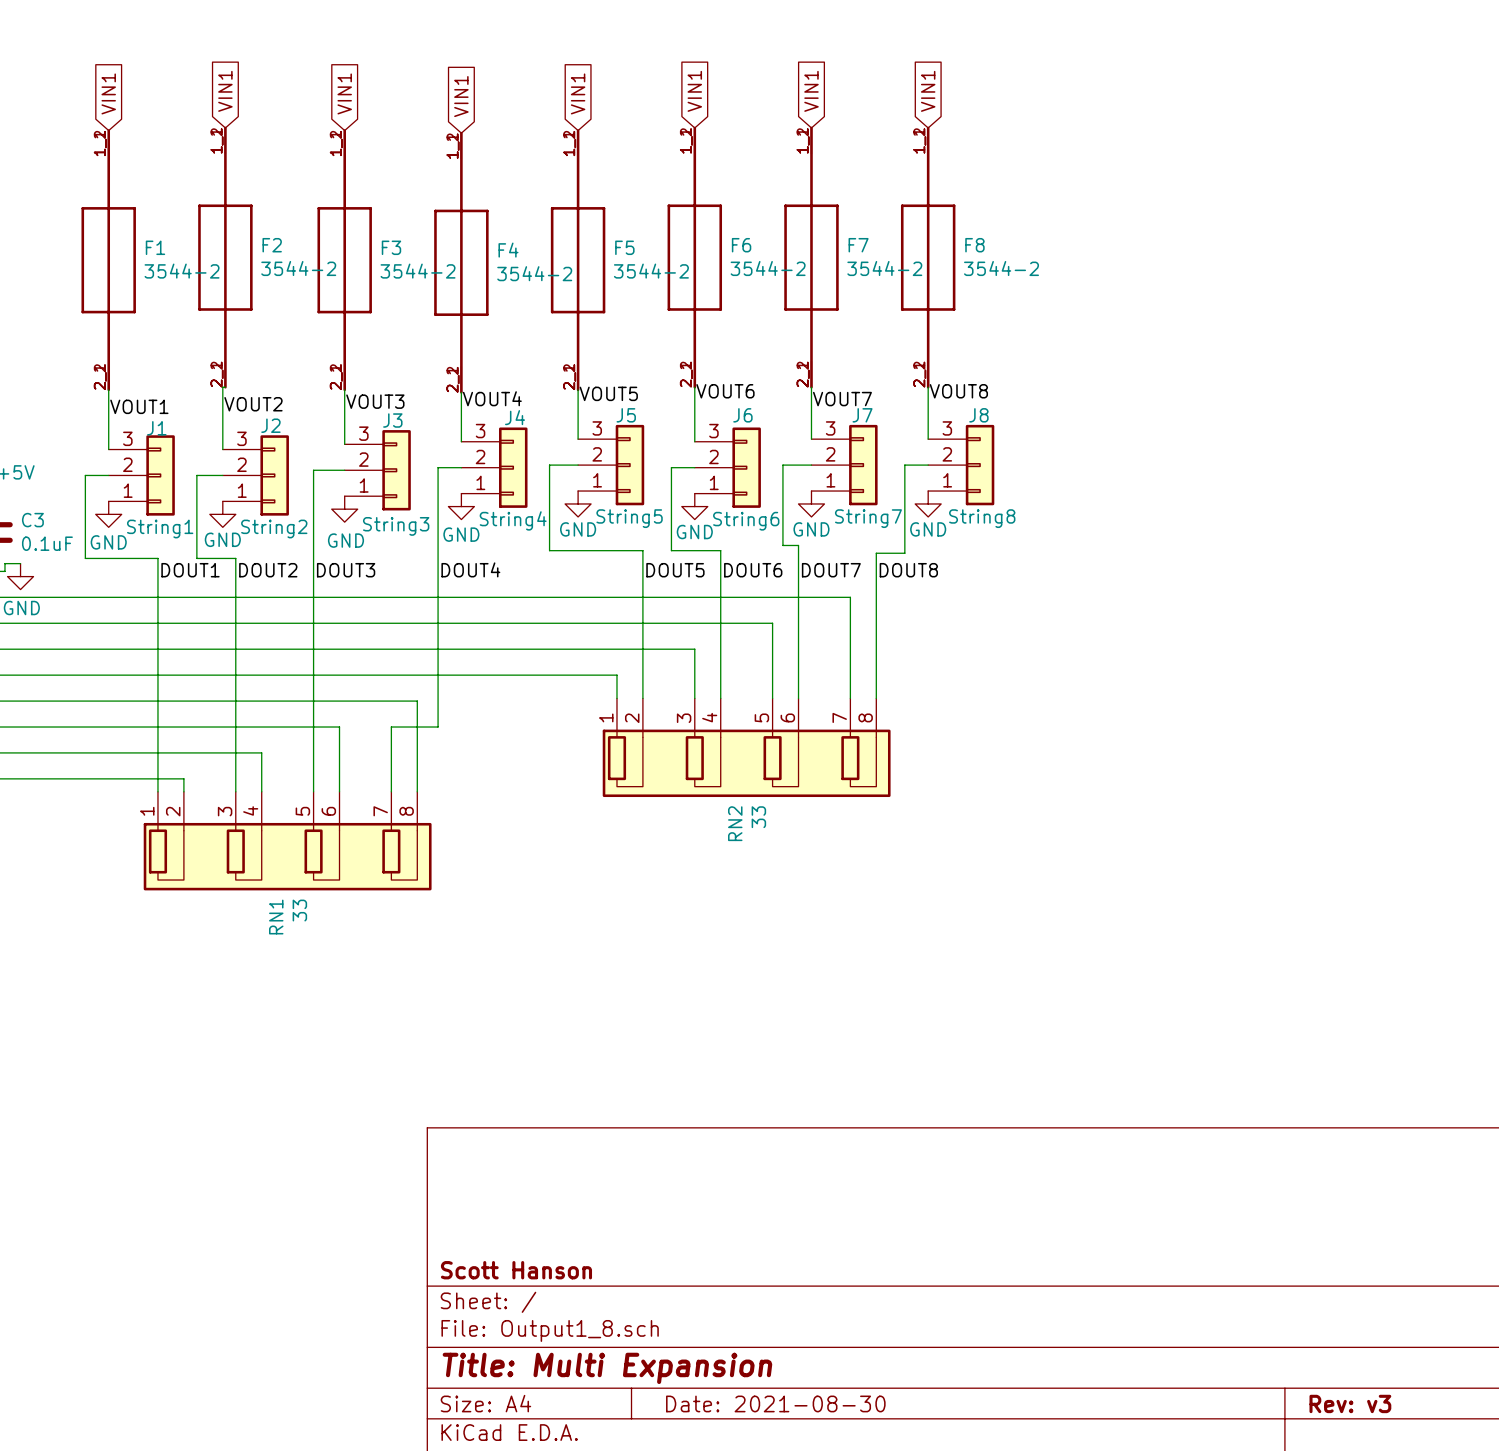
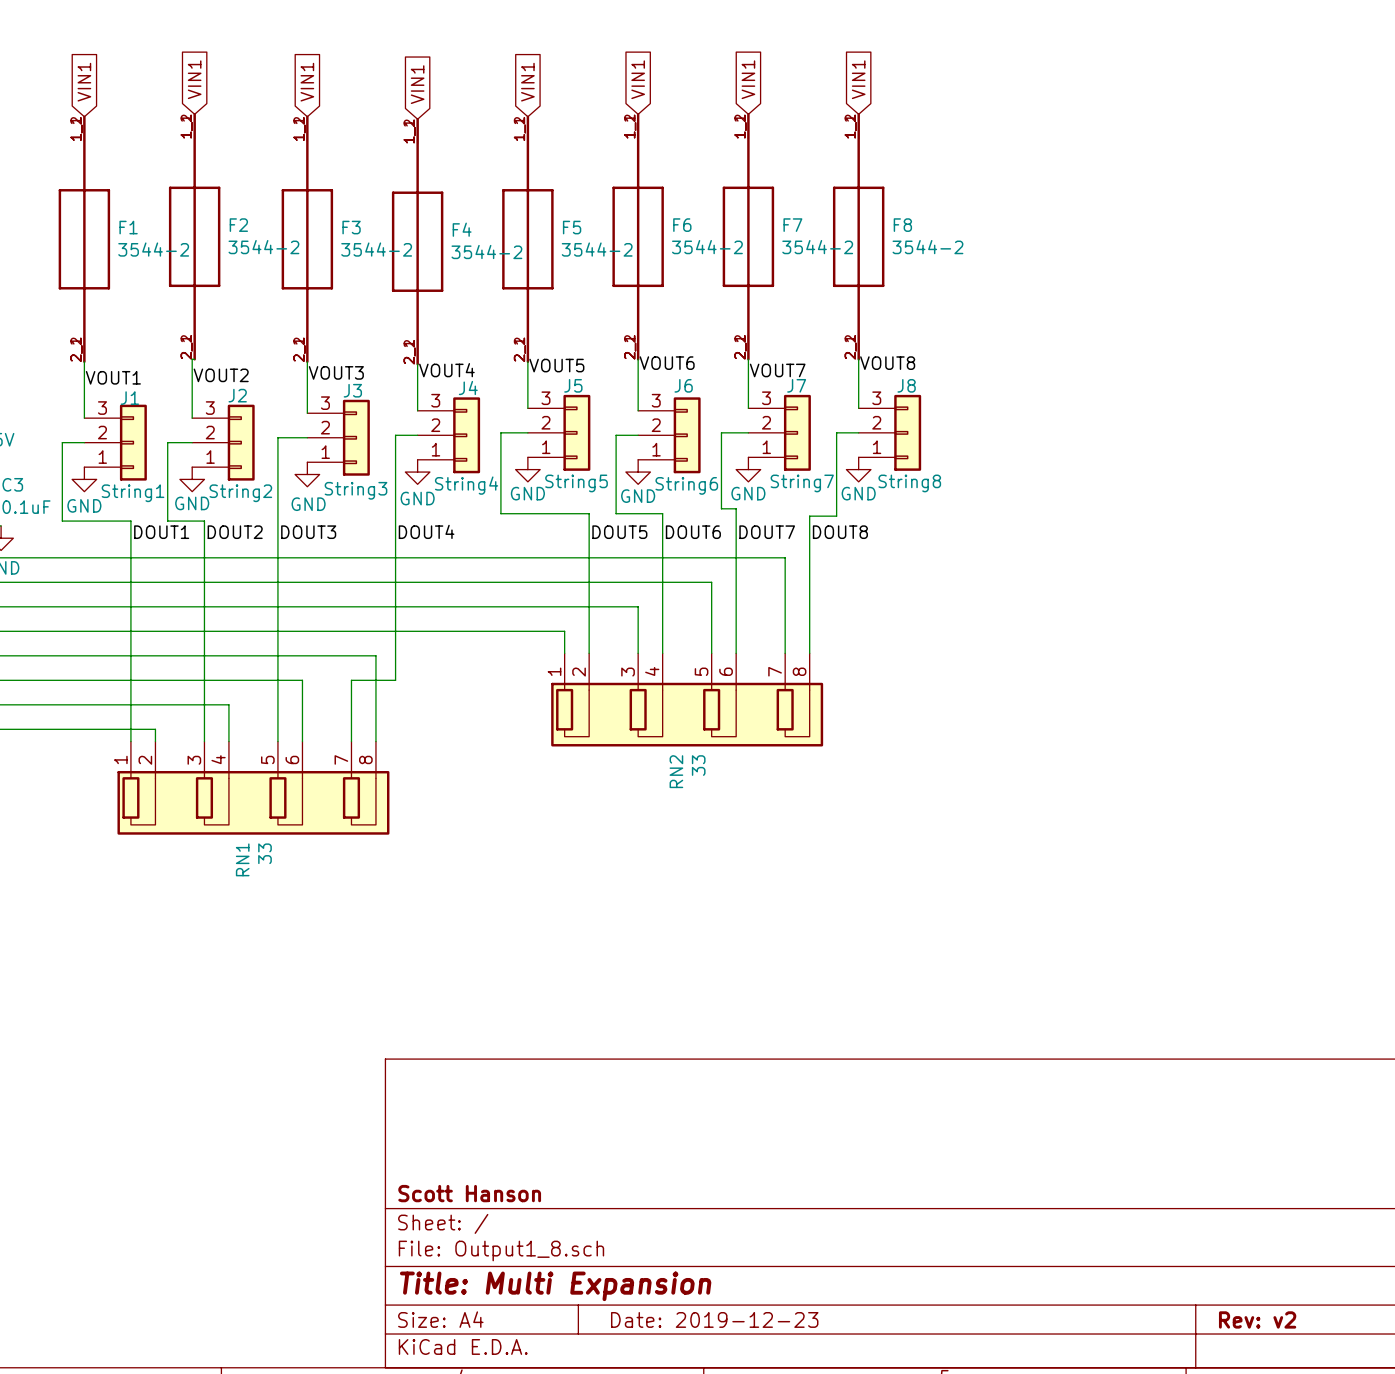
title block: Date: 2021-08-30 (775, 1403) -> Date: 2019-12-23 (714, 1319)
title block: Rev: v3 (1350, 1403) -> Rev: v2 (1257, 1319)

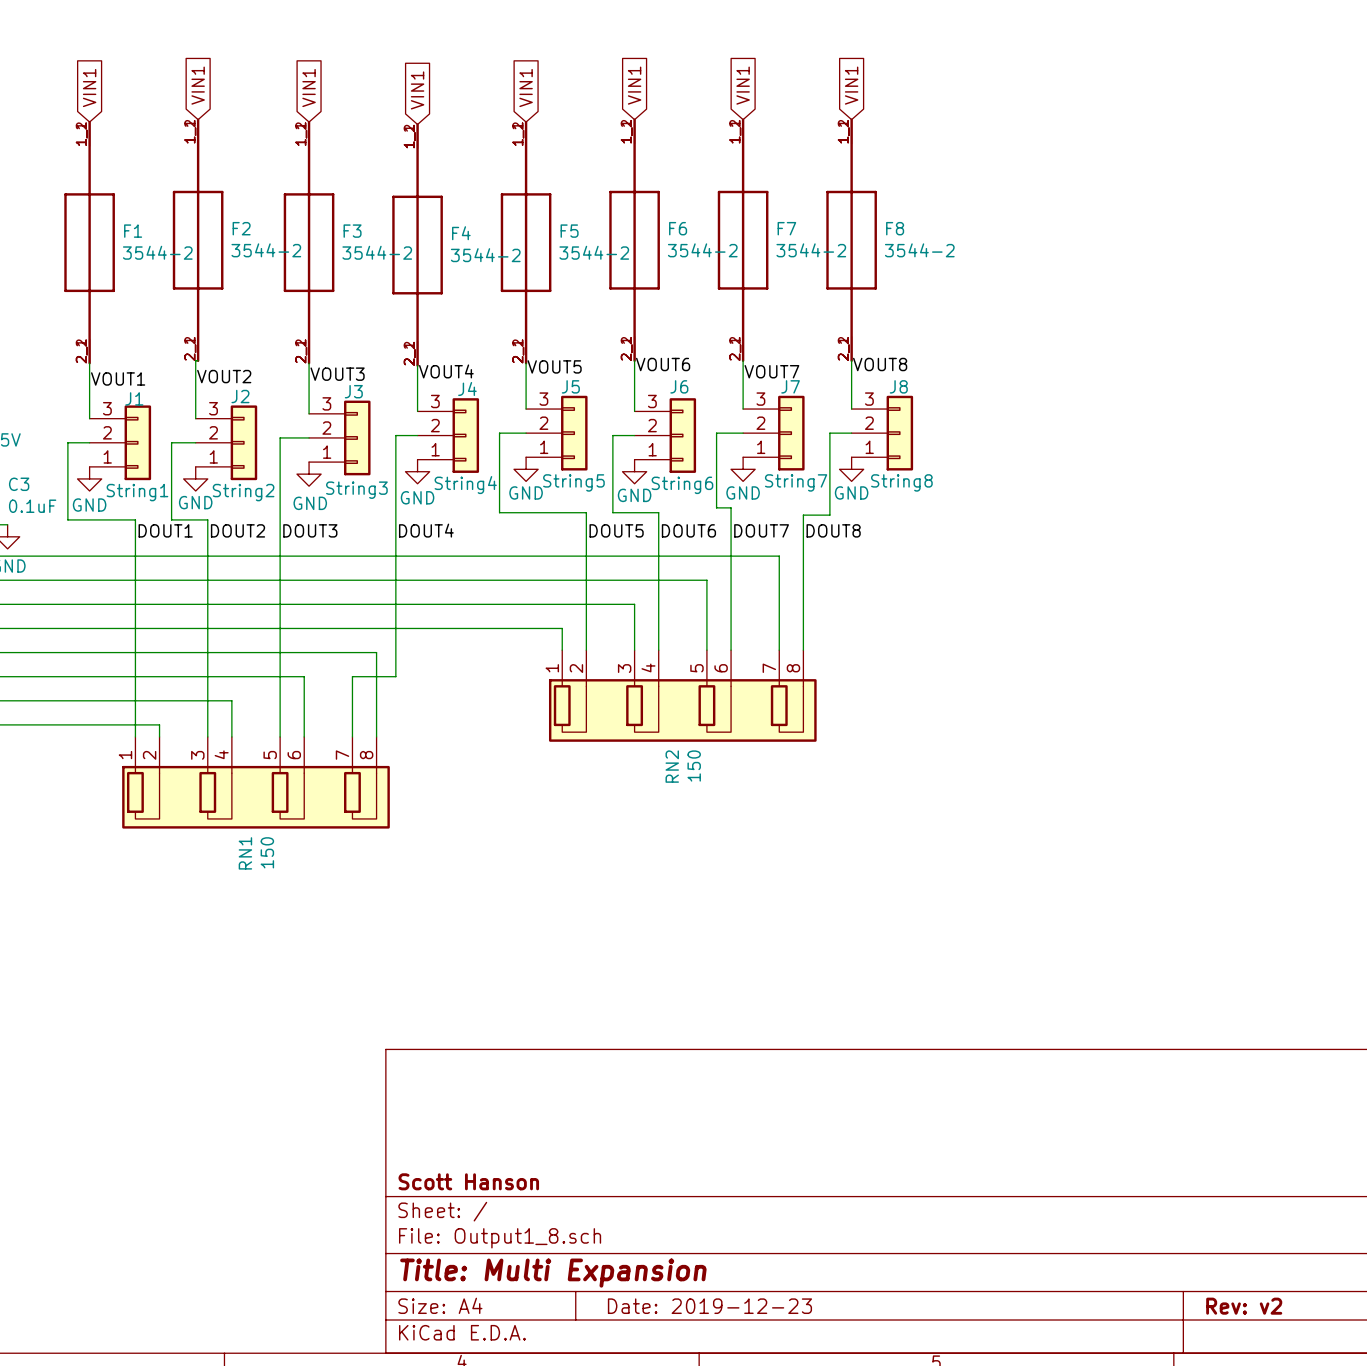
RN2 value: 33 (698, 765) -> 150 (694, 766)
RN1 value: 33 (265, 853) -> 150 (267, 852)

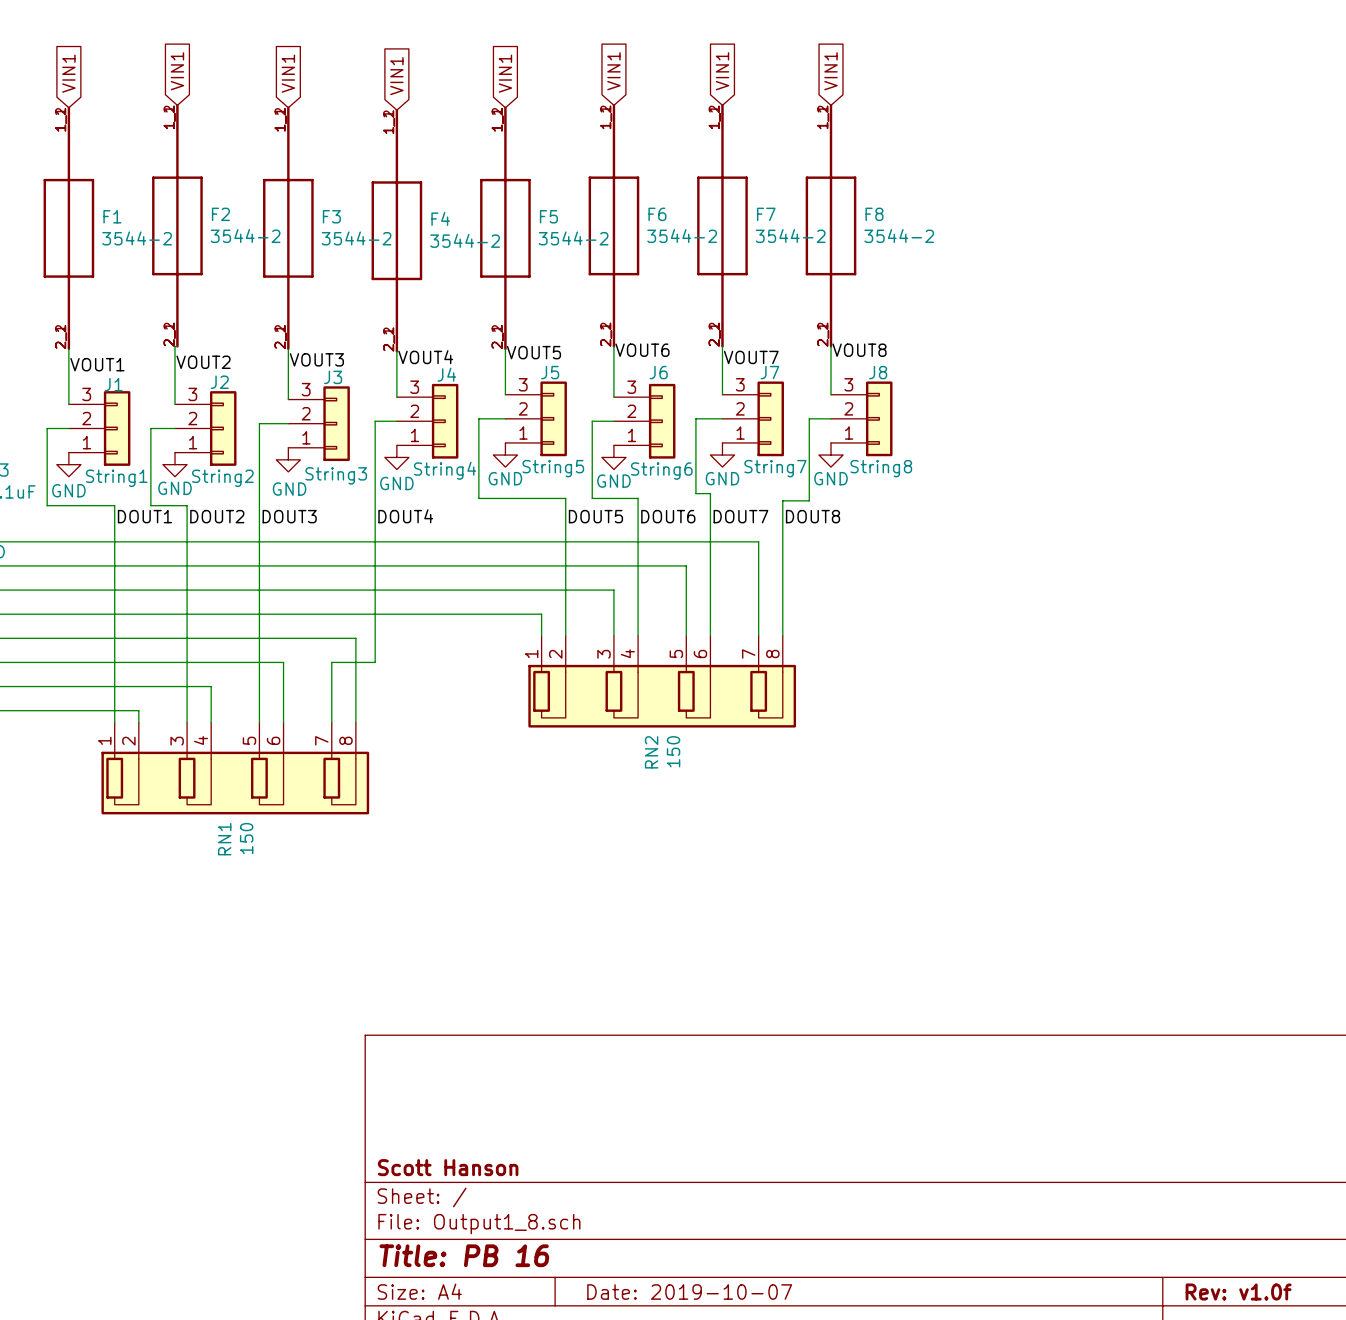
title block: Title: Multi Expansion (553, 1273) -> Title: PB 16 (464, 1255)
title block: Date: 2019-12-23 (709, 1306) -> Date: 2019-10-07 (689, 1292)
title block: Rev: v2 (1244, 1306) -> Rev: v1.0f (1238, 1292)

